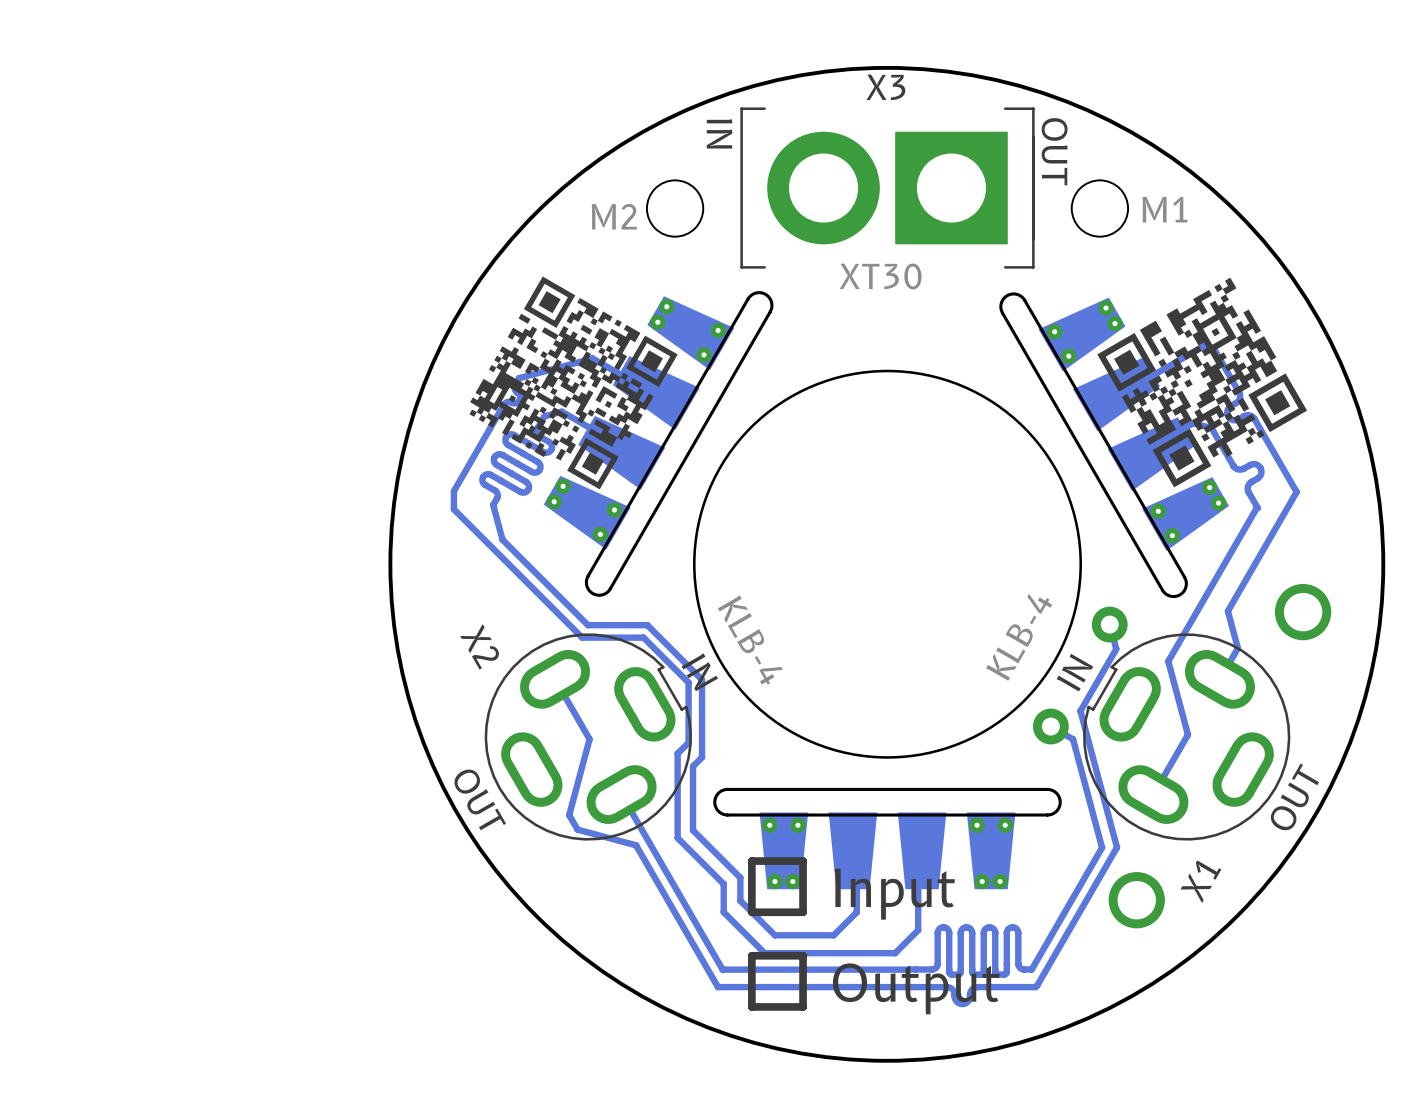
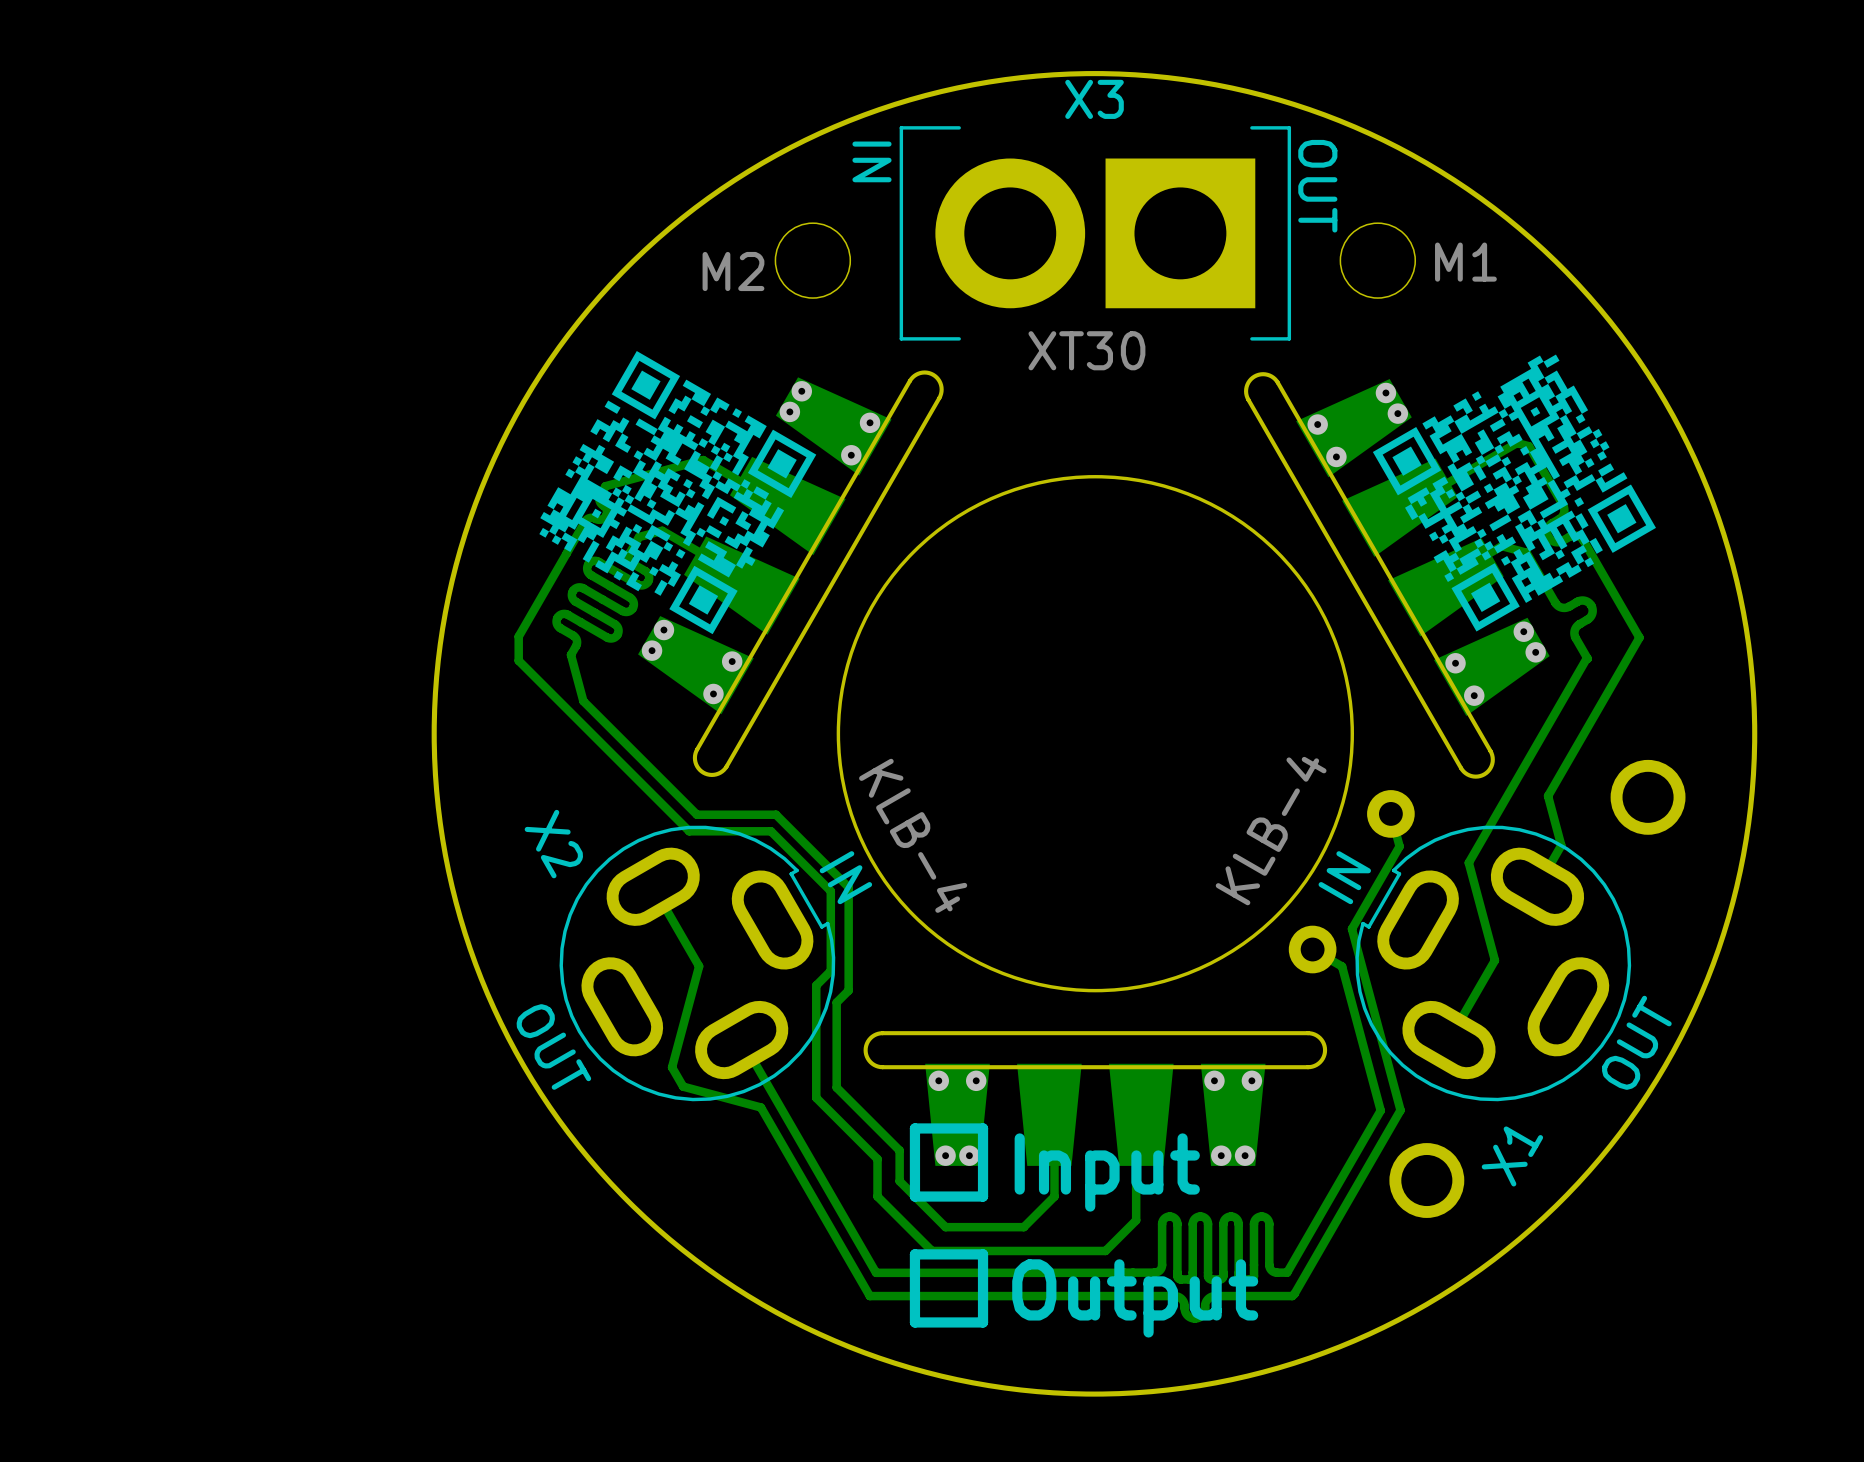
X3 footprint: [740, 107, 1035, 269] -> [899, 126, 1292, 341]
drawing shape: [1097, 277, 1308, 488] -> [1372, 354, 1656, 632]

